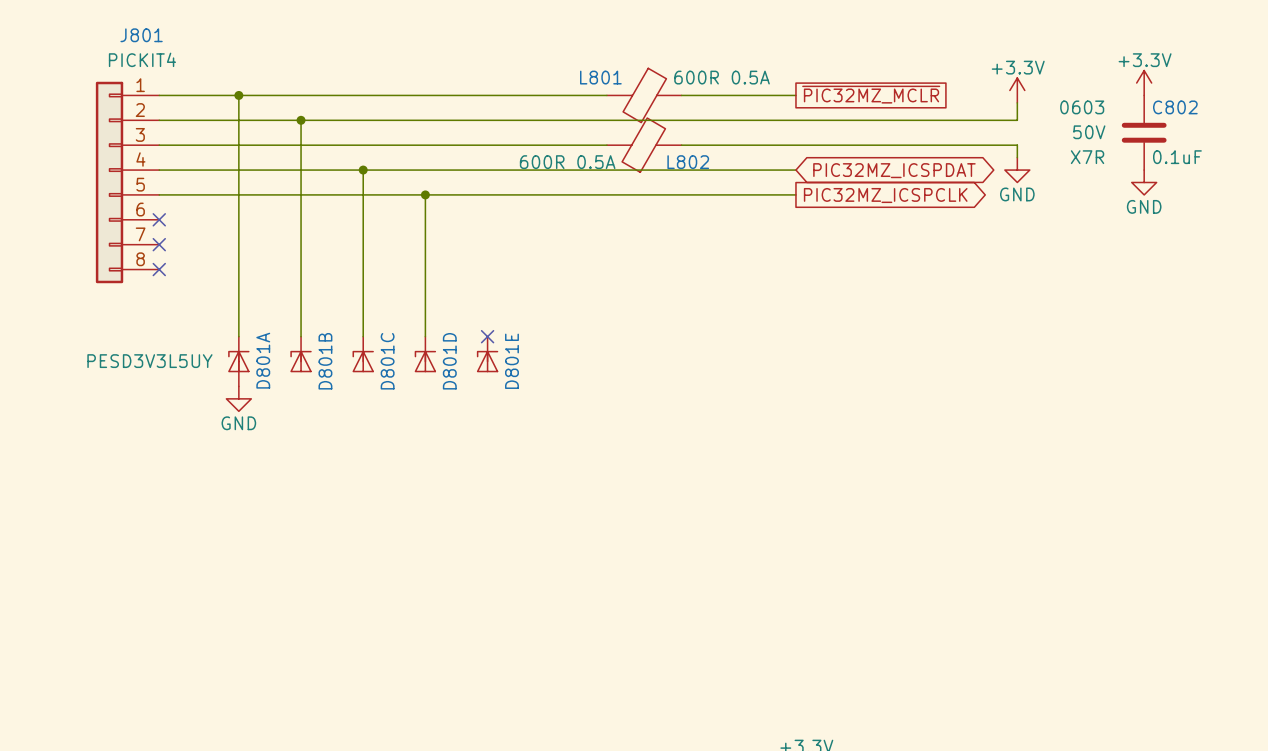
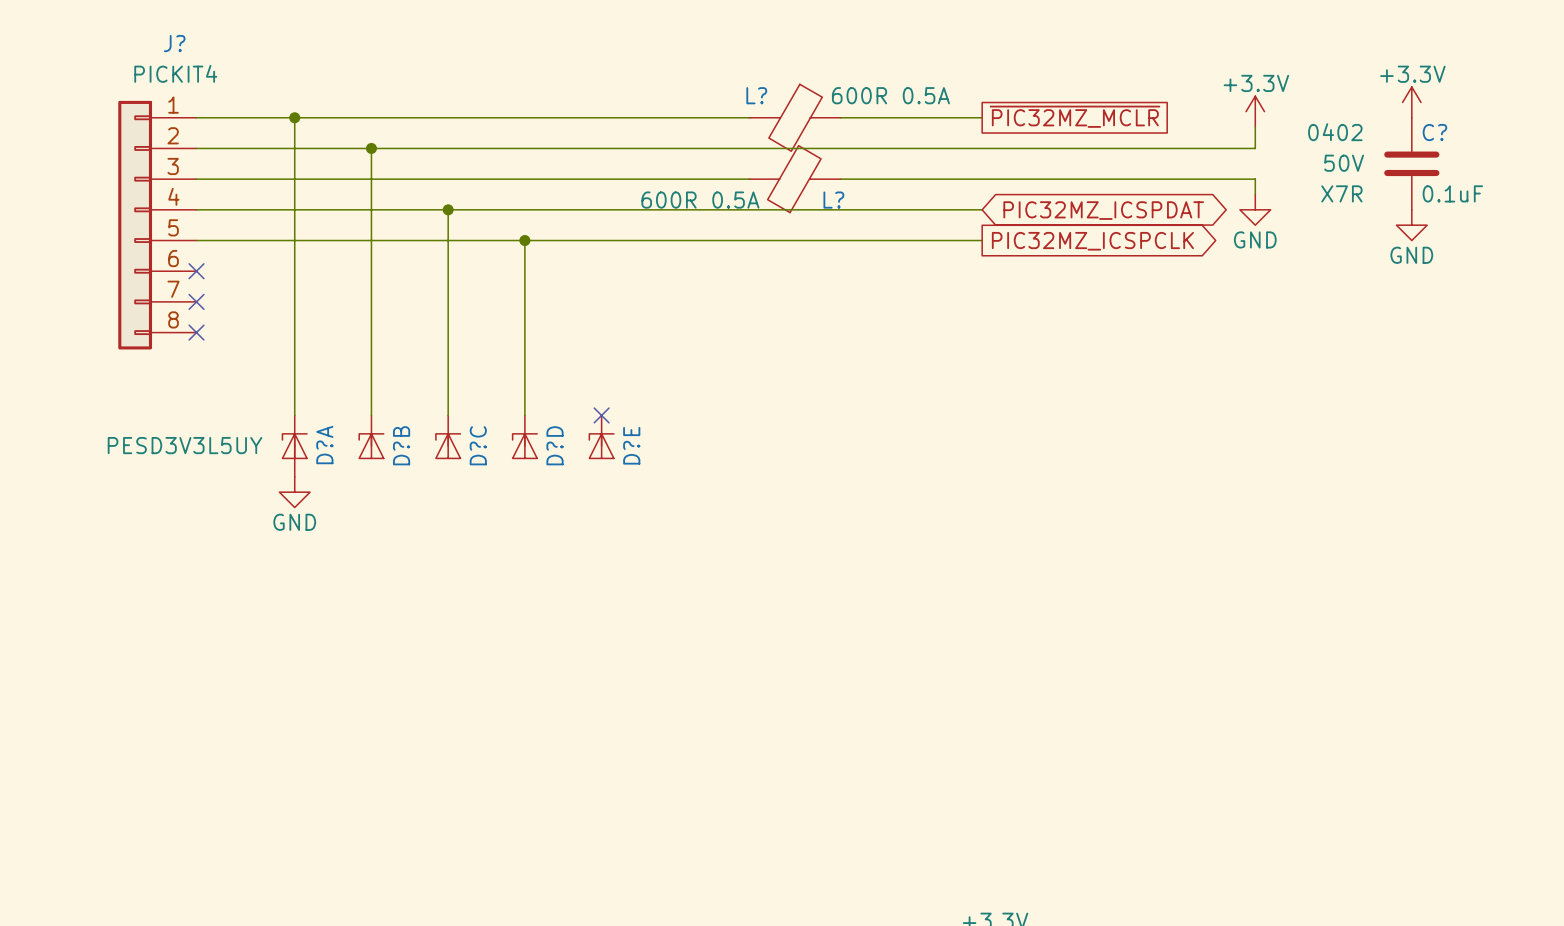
J801 name: J801 (141, 35) -> J? (174, 43)
L801 name: L801 (600, 77) -> L? (756, 95)
C802 text: 0603 (1082, 107) -> 0402 (1335, 132)
C802 name: C802 (1175, 107) -> C? (1434, 132)
L802 name: L802 (688, 162) -> L? (833, 200)
D801A name: D801A (263, 360) -> D?A (324, 445)
D801B name: D801B (325, 361) -> D?B (401, 445)
D801C name: D801C (387, 361) -> D?C (478, 445)
D801D name: D801D (449, 361) -> D?D (555, 445)
D801E name: D801E (511, 361) -> D?E (631, 445)

